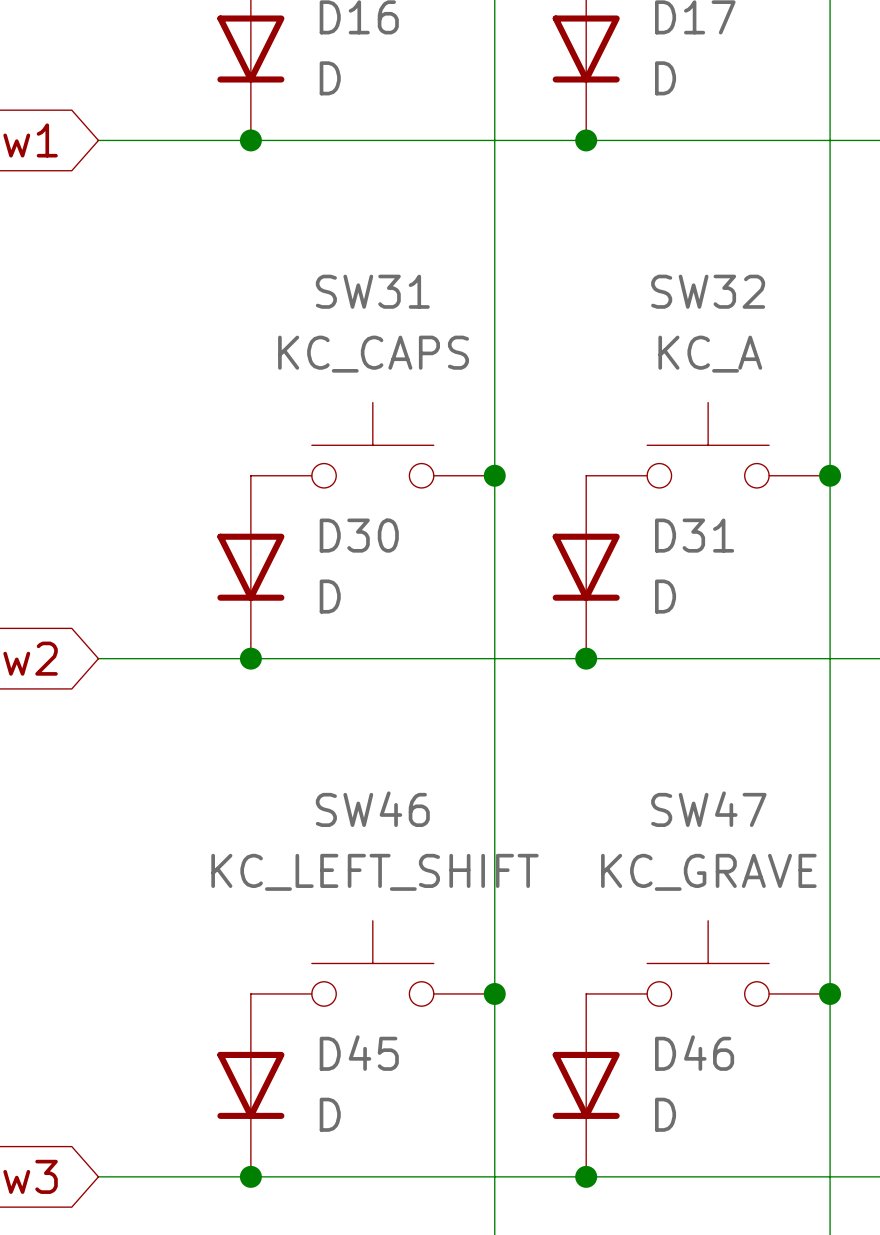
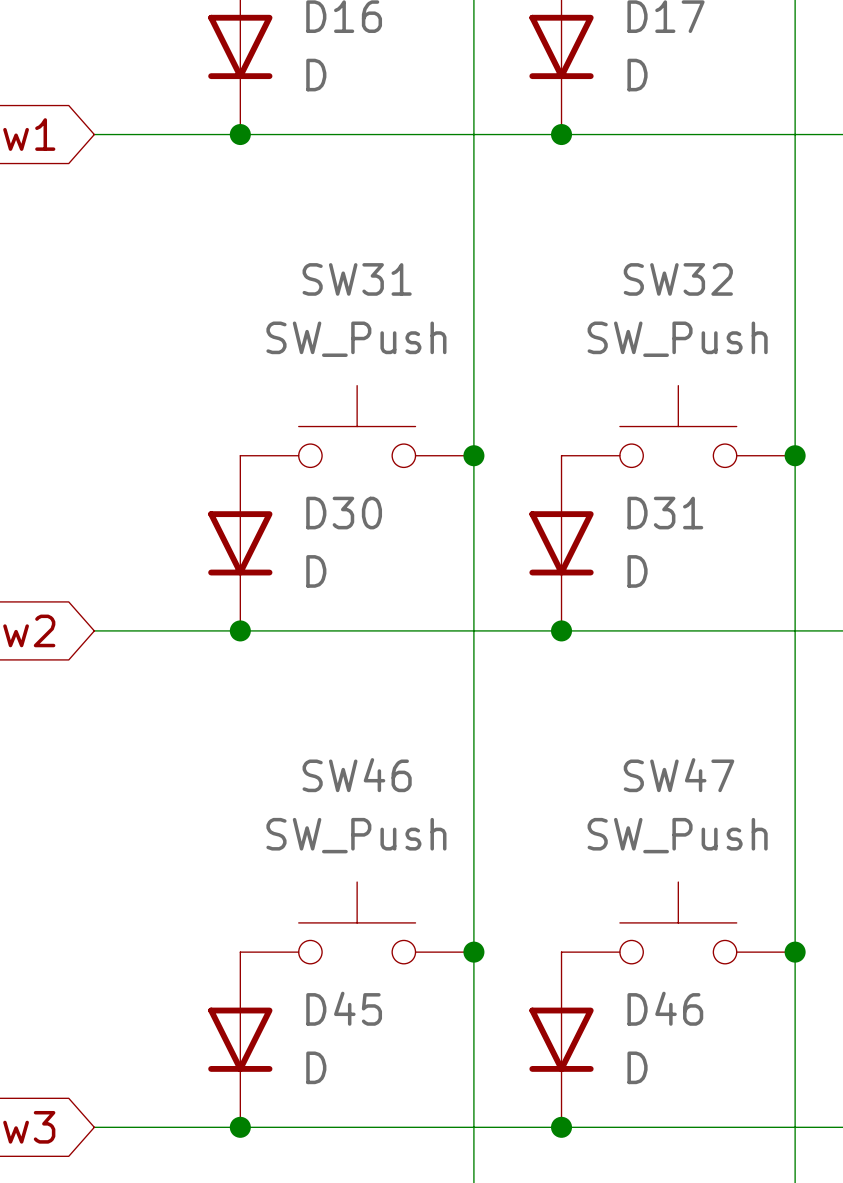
SW31 value: KC_CAPS (373, 354) -> SW_Push (356, 339)
SW32 value: KC_A (710, 354) -> SW_Push (677, 339)
SW46 value: KC_LEFT_SHIFT (374, 872) -> SW_Push (356, 835)
SW47 value: KC_GRAVE (708, 872) -> SW_Push (677, 835)

